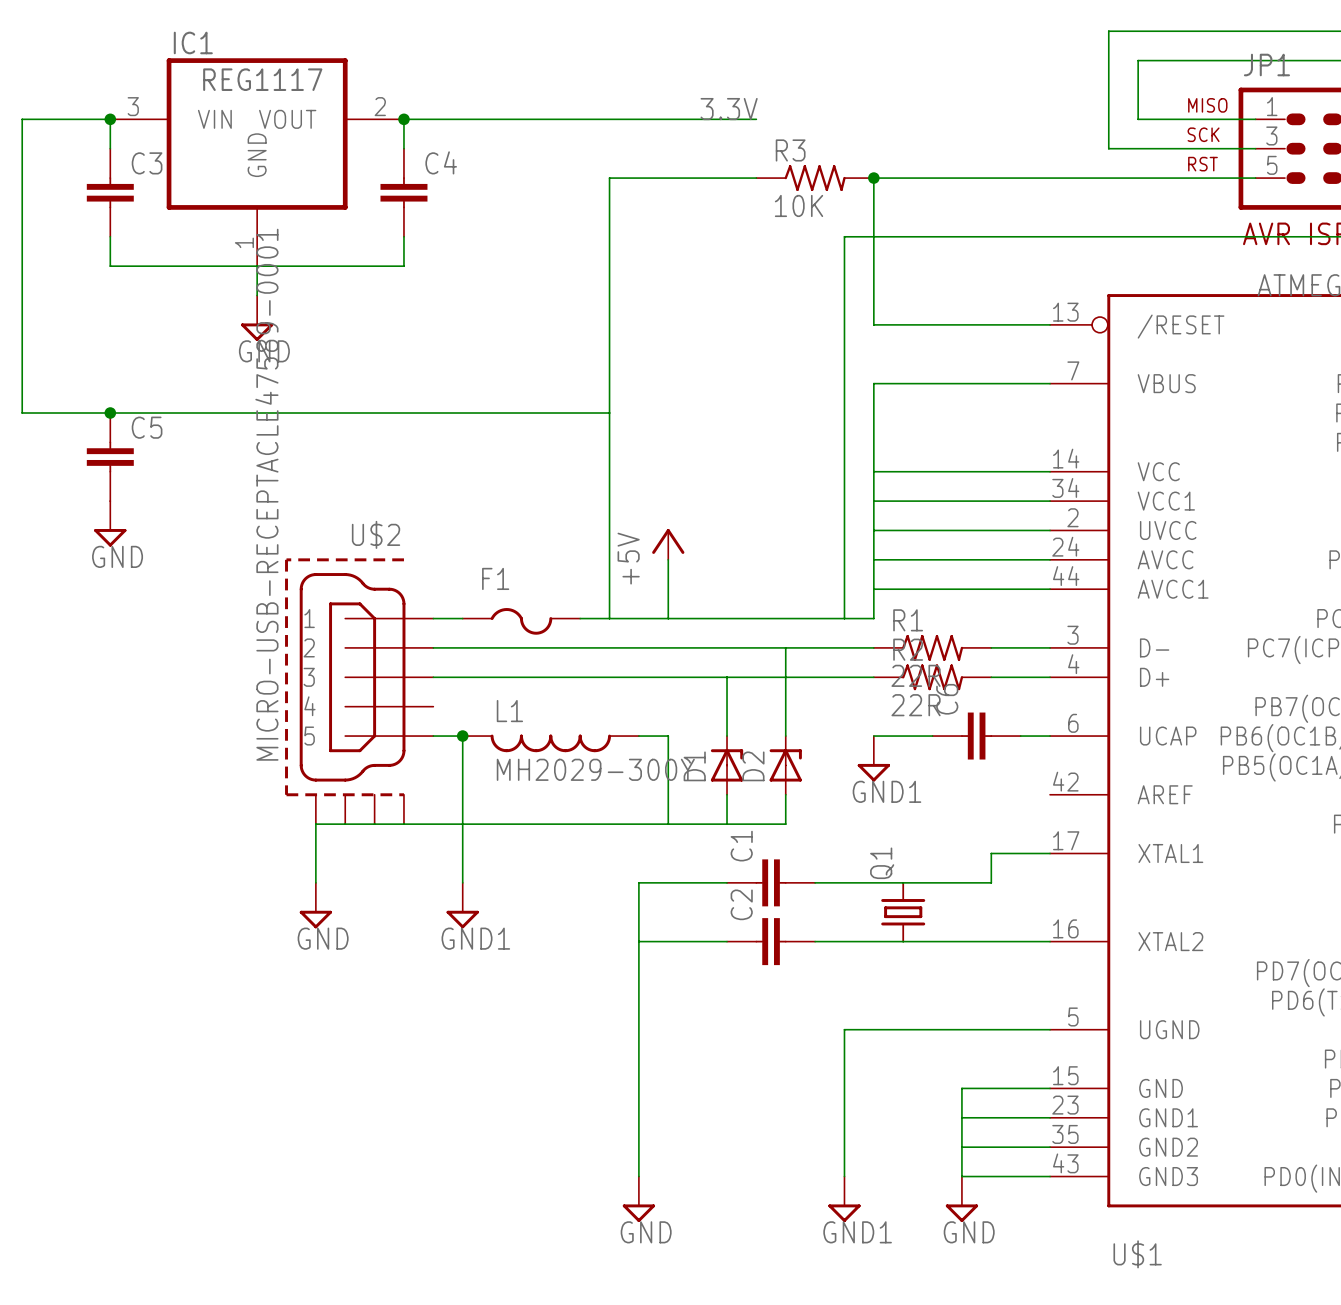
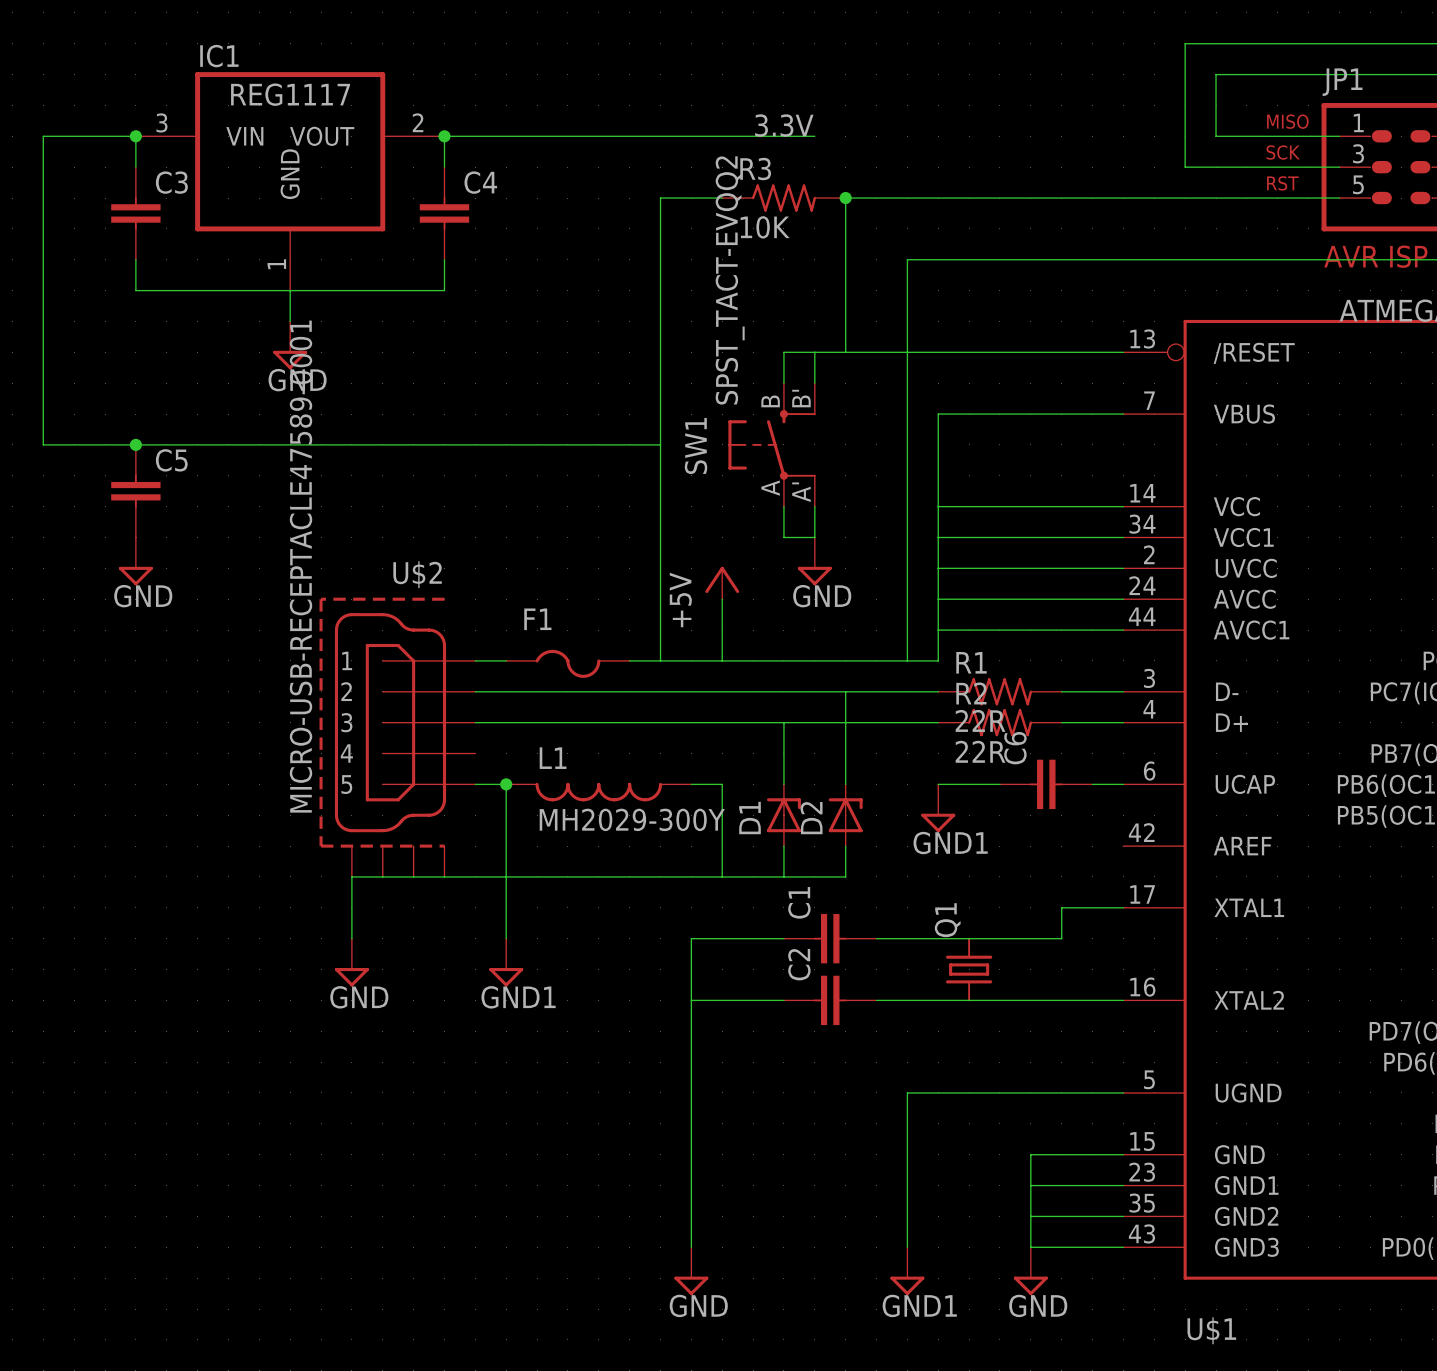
junction: none -> (845, 198)
R3 position: (815, 178) -> (783, 198)
wire: (873, 178) (873, 324) -> (938, 198) (845, 198) (845, 352)
junction: (873, 178) -> none
wire: none -> (814, 352) (814, 383)
wire: none -> (938, 352) (783, 352) (783, 383)
SW1: none -> SPST_TACT-EVQQ2 (772, 444)
wire: none -> (783, 506) (783, 537) (814, 537) (814, 506)
power symbol: none -> GND (814, 561)

